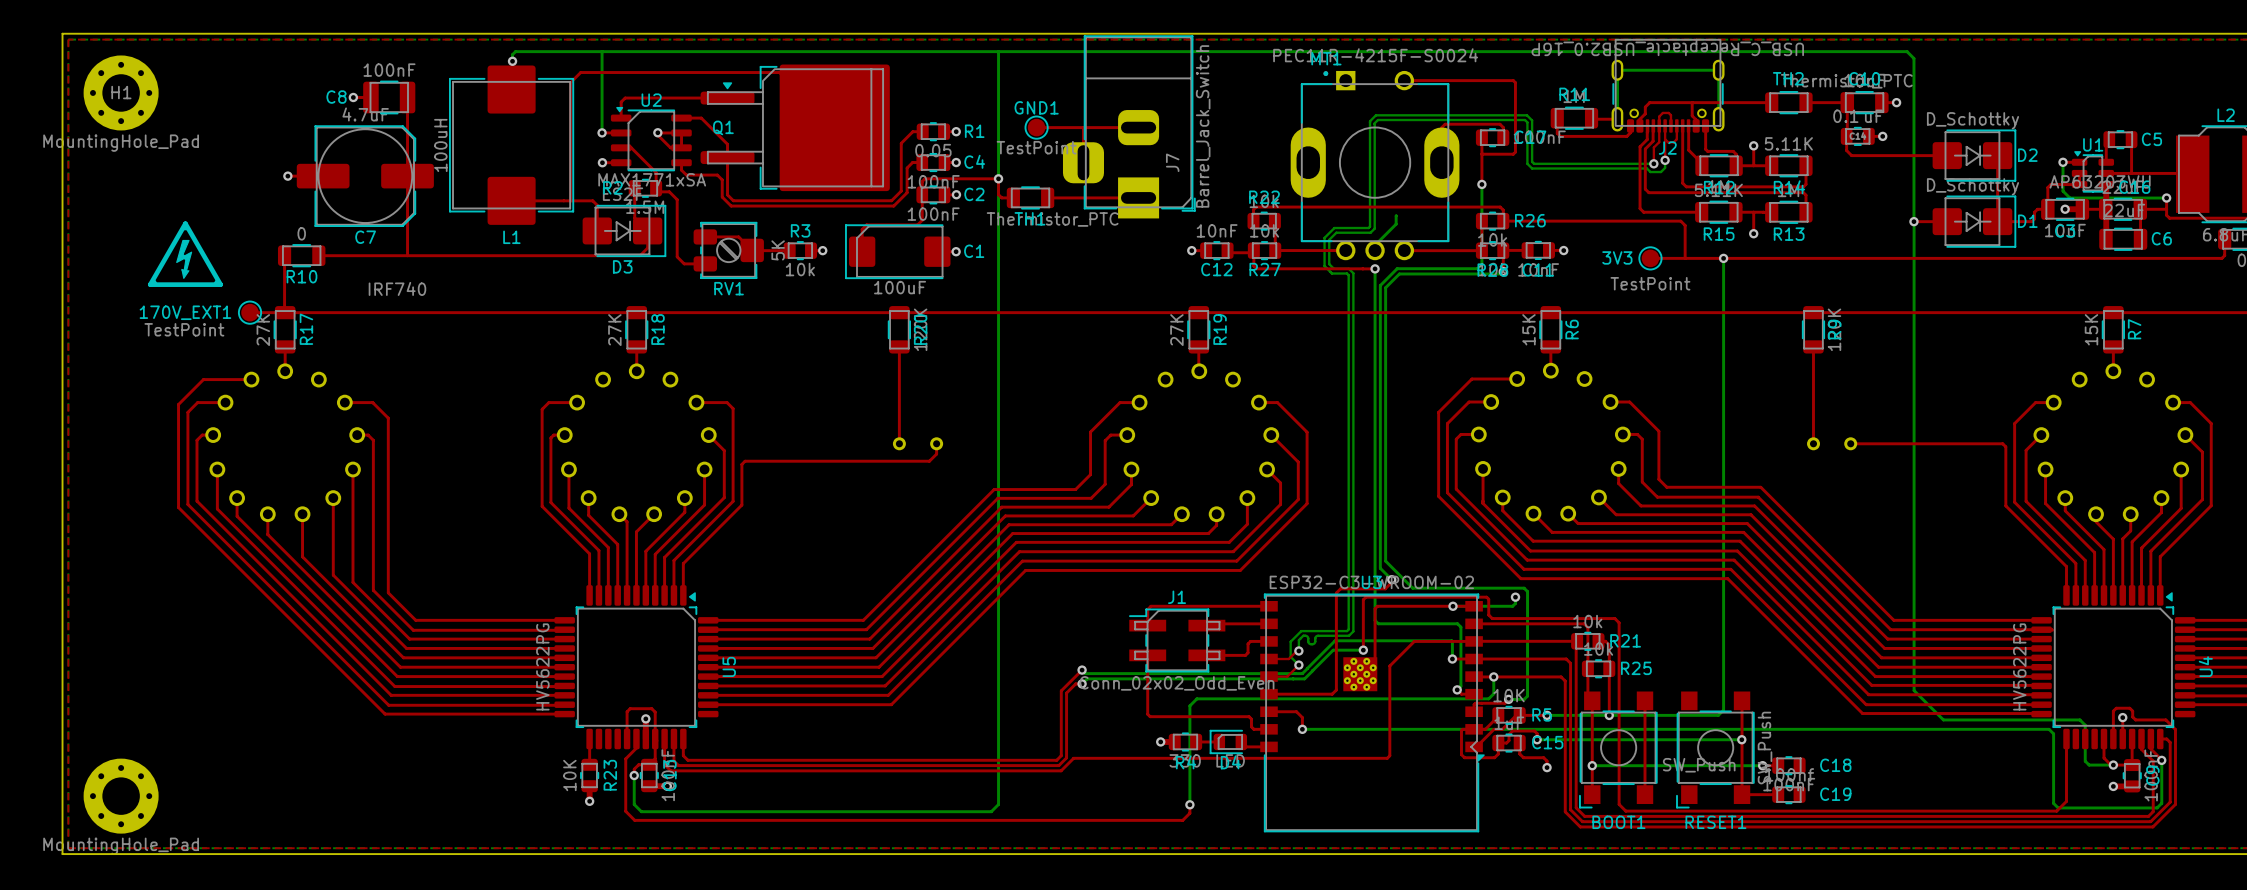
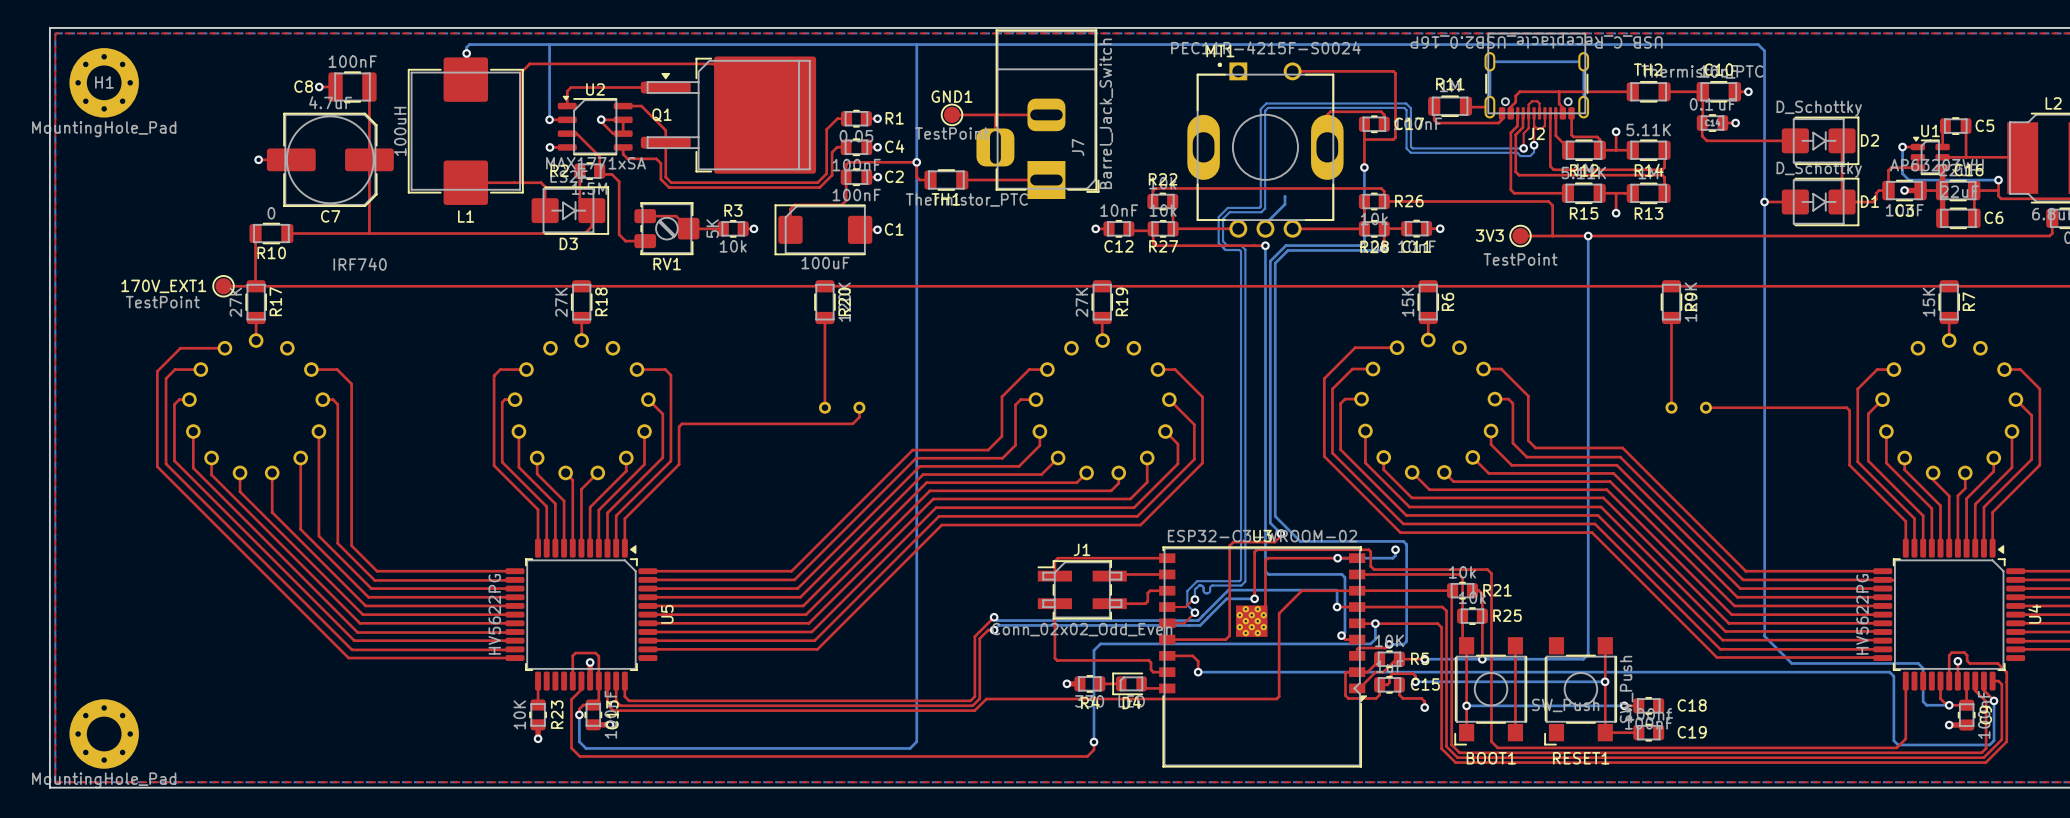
drawing: [147, 221, 223, 287] -> none

